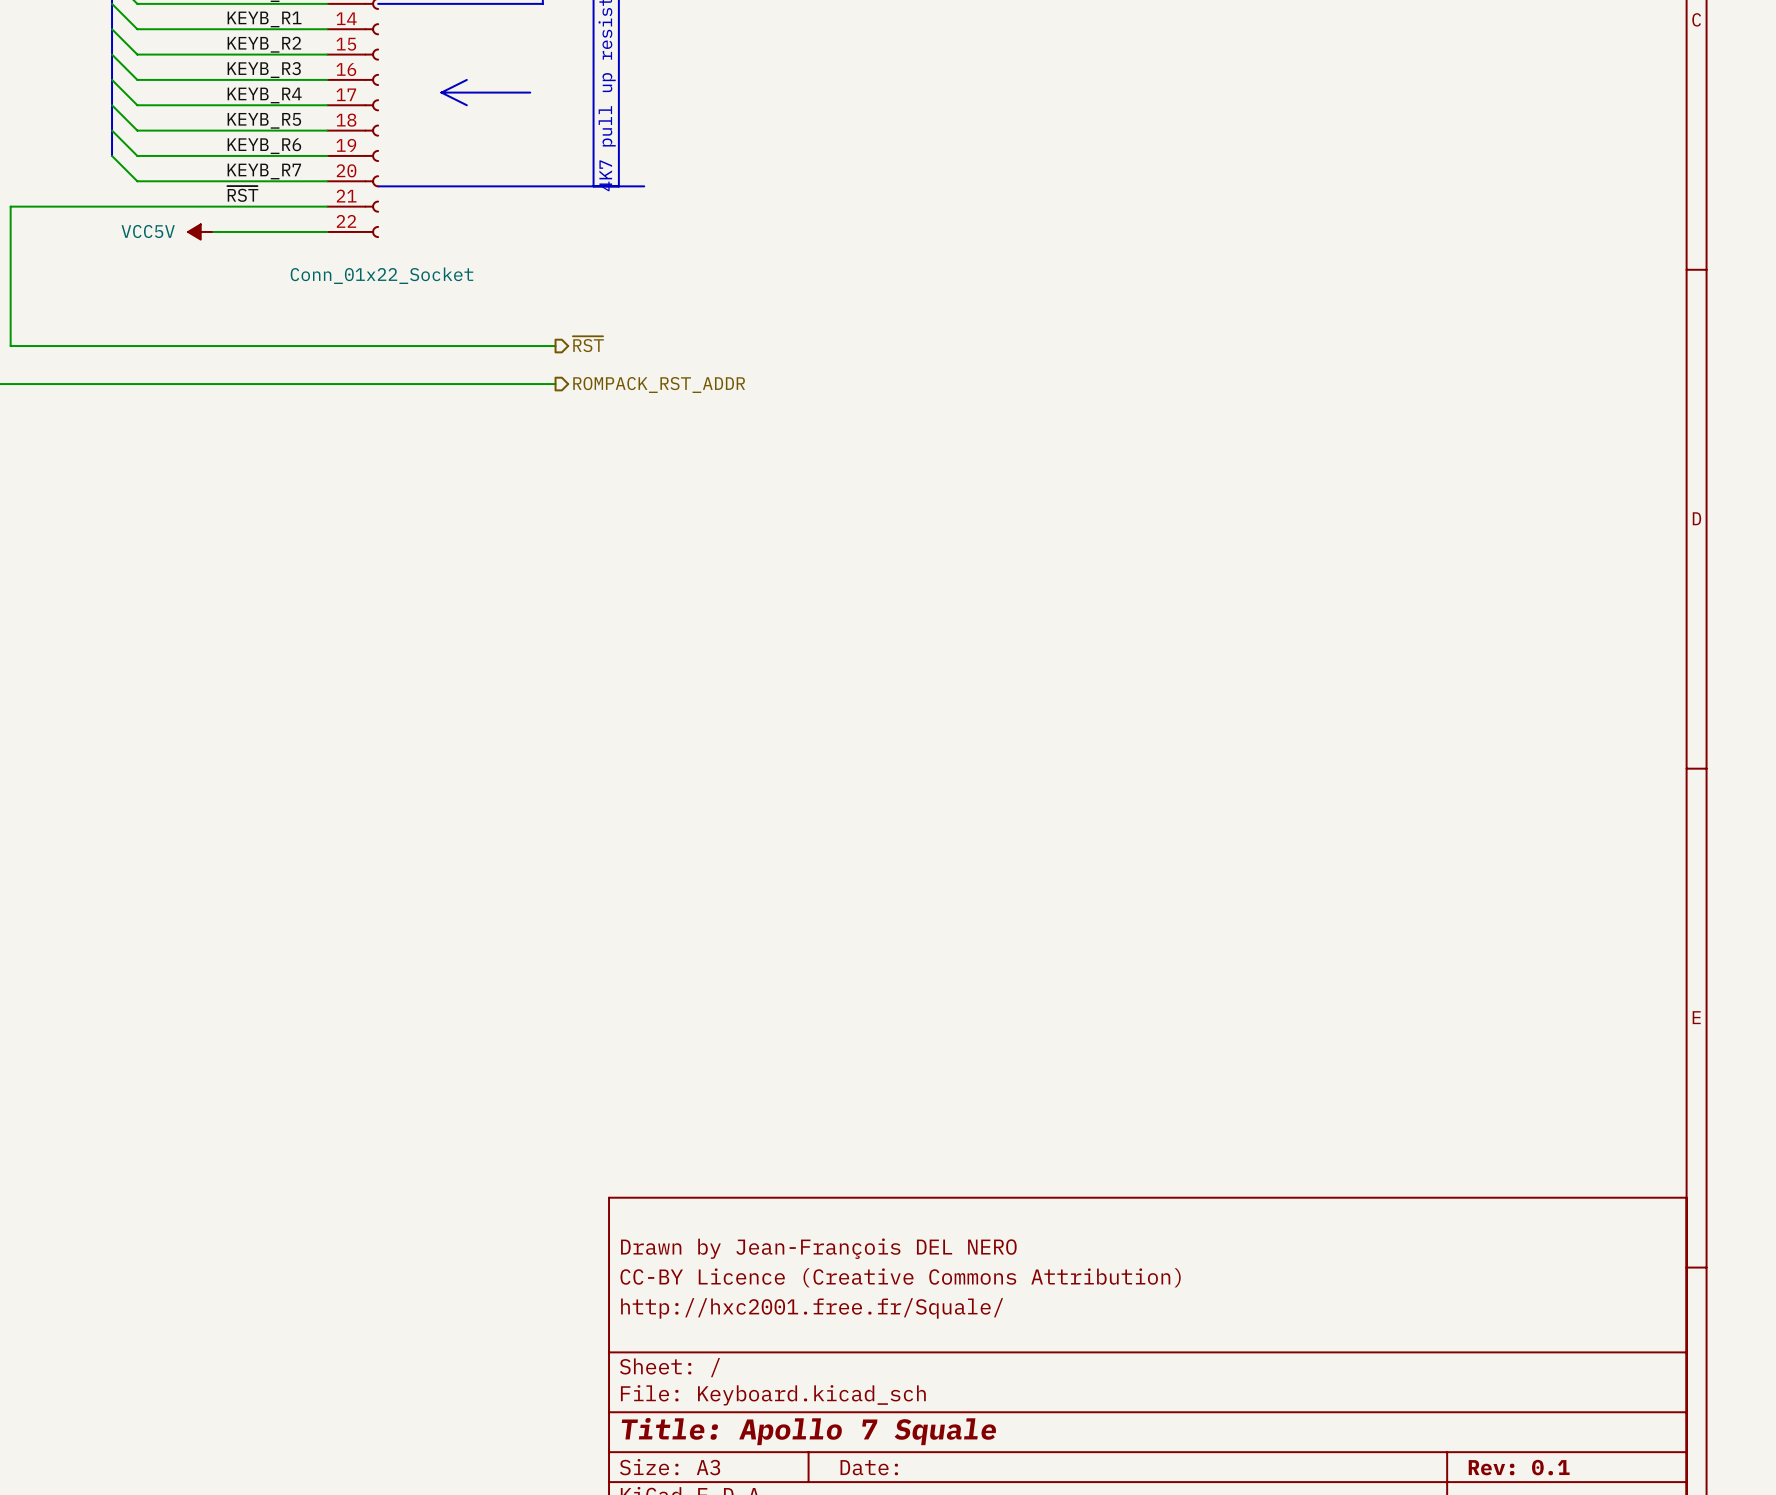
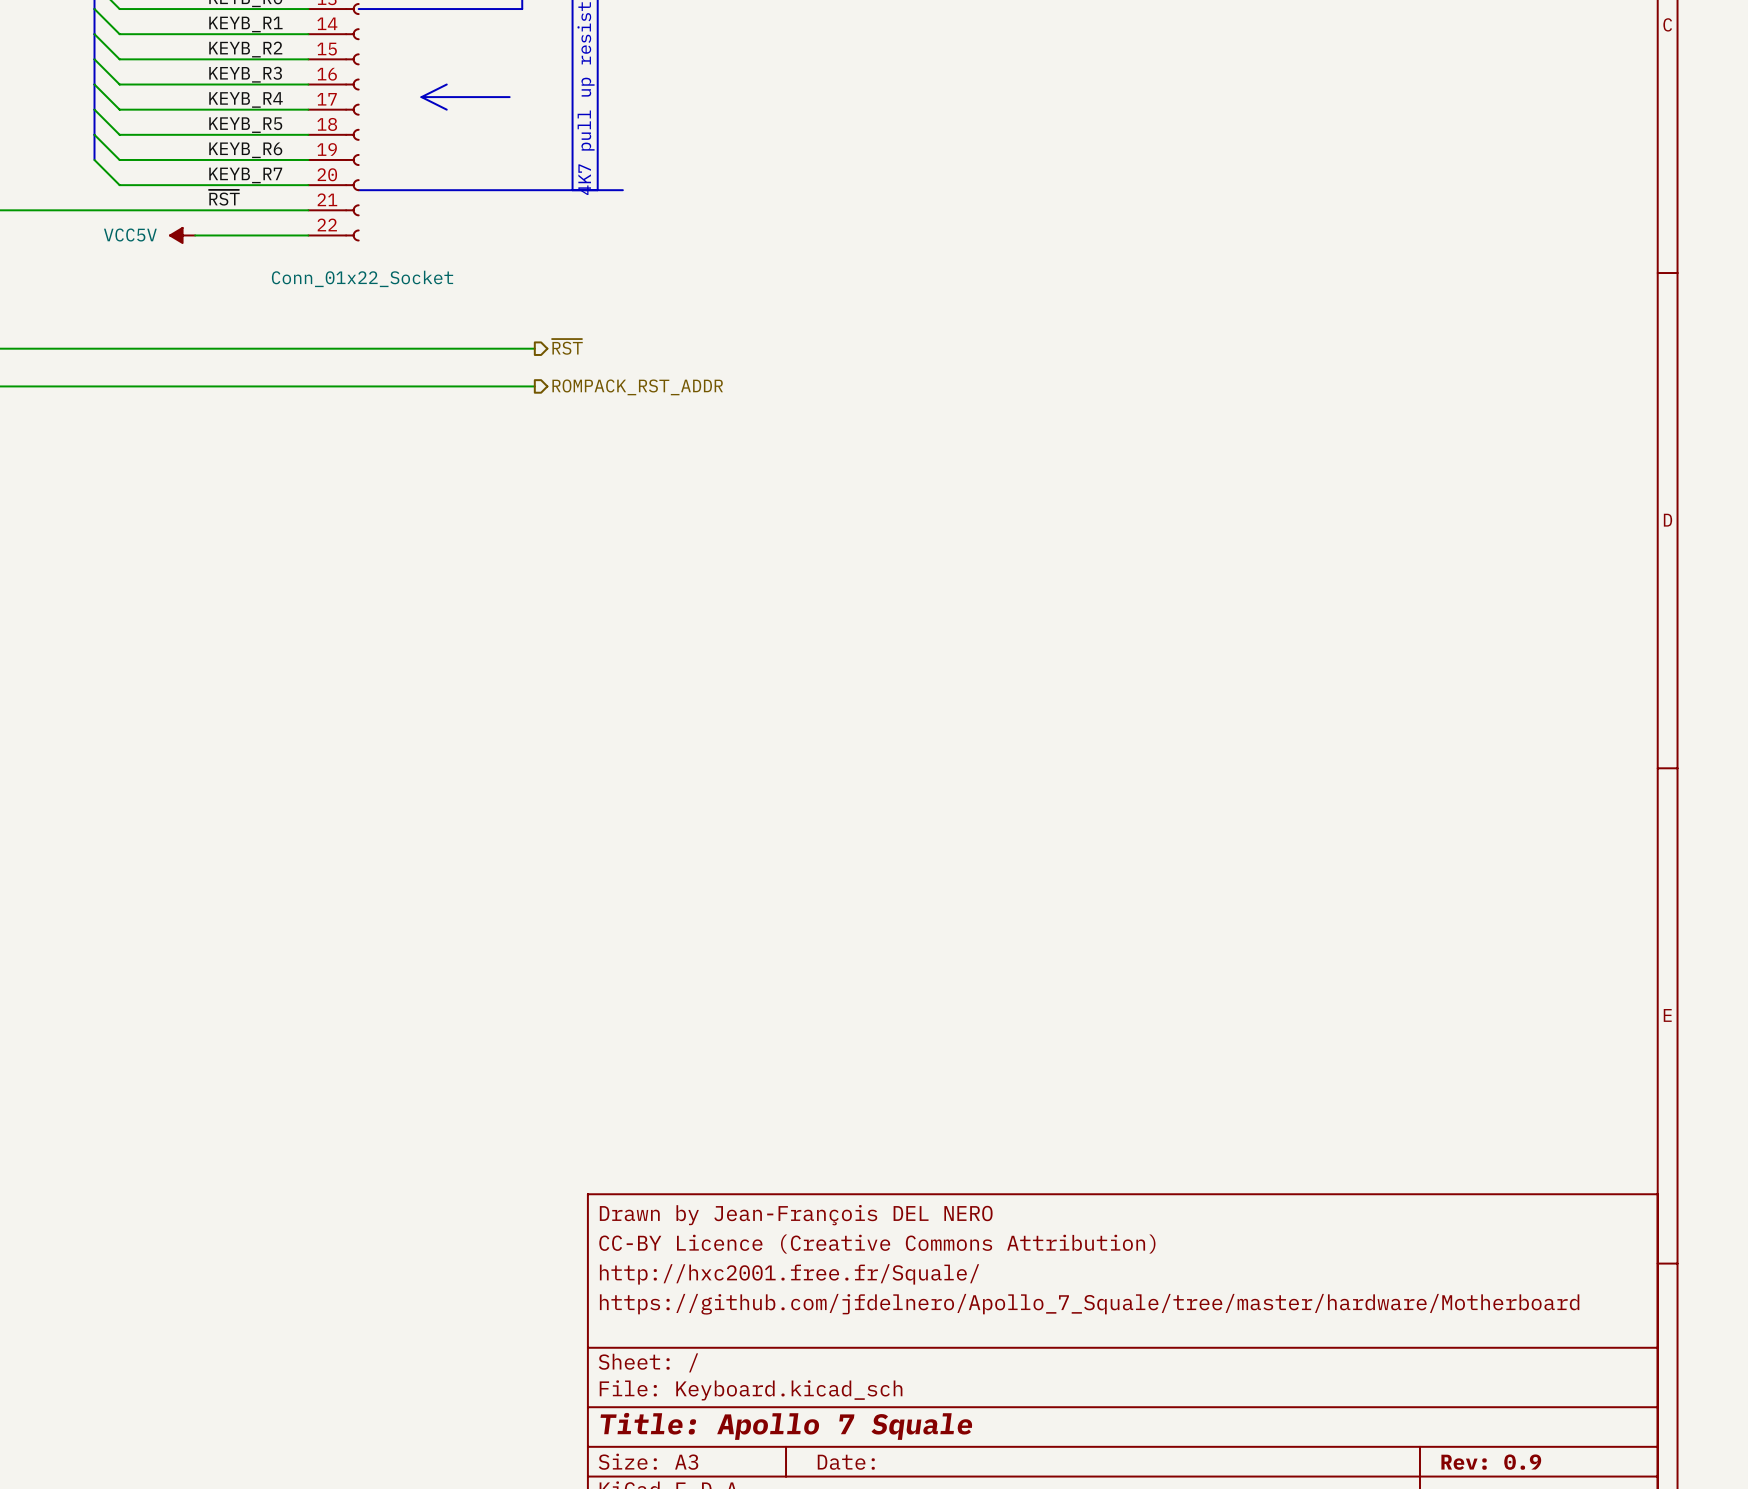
title block: none -> Drawn by Jean-François DEL NERO (796, 1215)
title block: Drawn by Jean-François DEL NERO (818, 1248) -> CC-BY Licence (Creative Commons Attribution) (877, 1244)
title block: CC-BY Licence (Creative Commons Attribution) (900, 1277) -> http://hxc2001.free.fr/Squale/ (789, 1274)
title block: http://hxc2001.free.fr/Squale/ (812, 1308) -> https://github.com/jfdelnero/Apollo_7_Squale/tree/master/hardware/Motherboard (1089, 1304)
title block: Rev: 0.1 (1519, 1467) -> Rev: 0.9 (1491, 1462)

